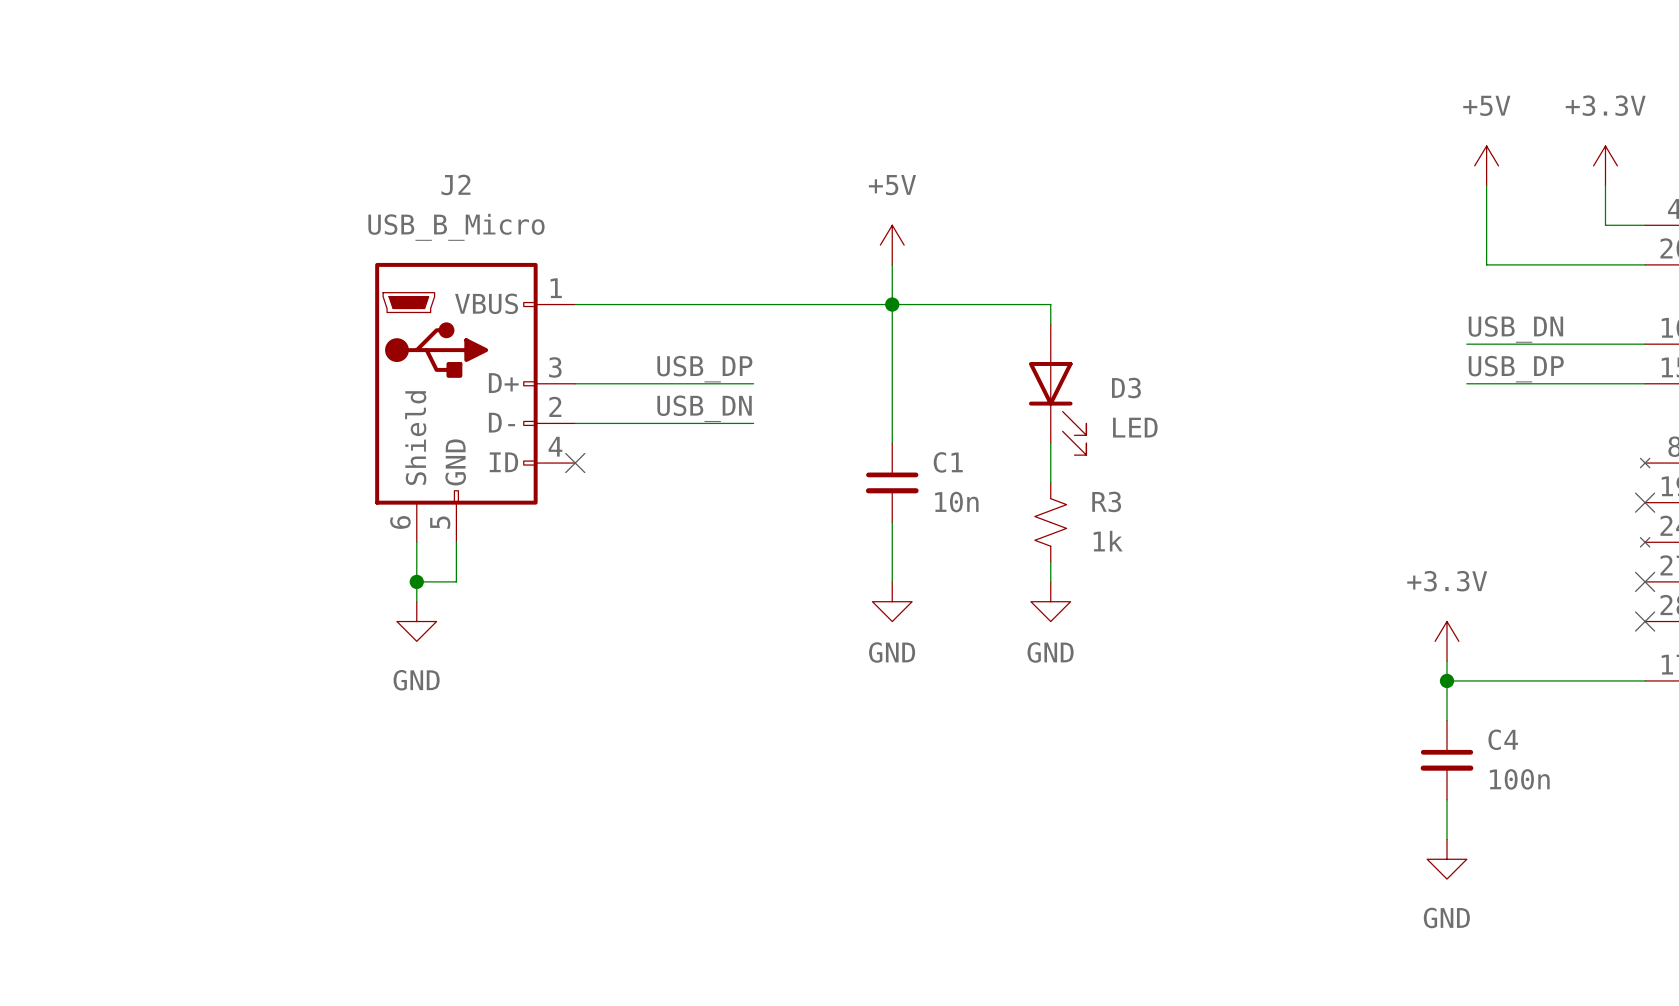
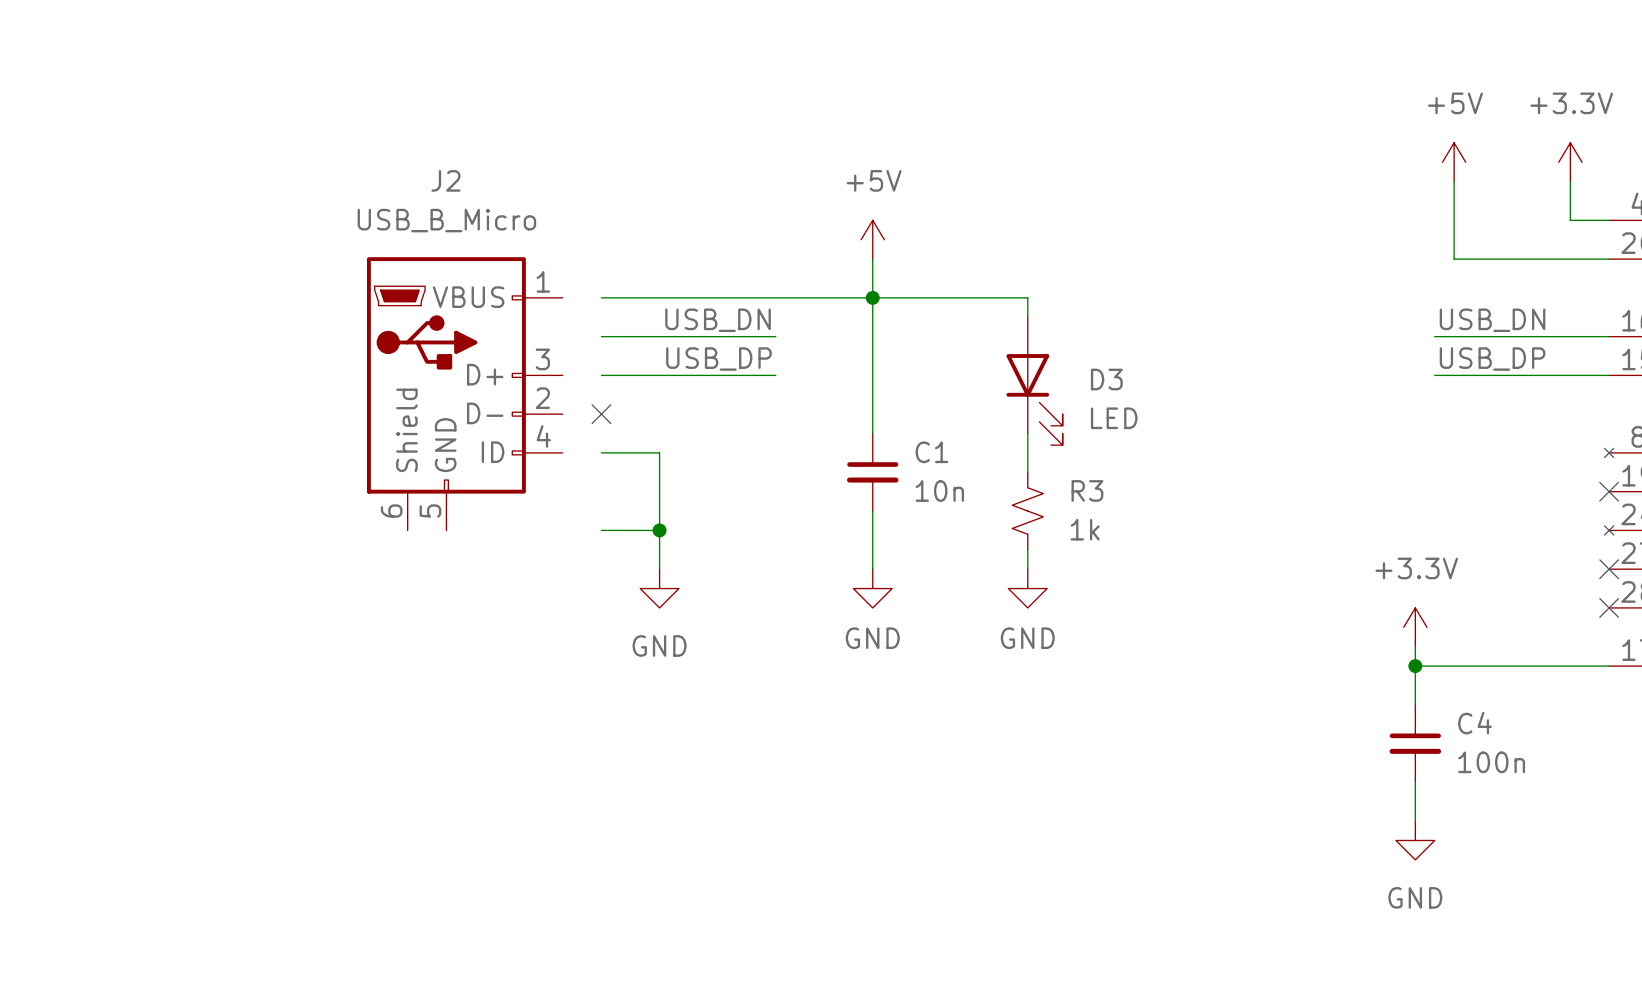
wire: (575, 304) (614, 304) -> none
label position: USB_DP (704, 369) -> USB_DP (718, 359)
wire: (575, 383) (614, 383) -> (737, 375) (775, 375)
label position: USB_DN (704, 408) -> USB_DN (718, 320)
wire: (575, 423) (753, 423) -> (601, 336) (775, 336)
no-connect mark position: (575, 463) -> (601, 414)
wire: none -> (601, 452) (659, 452) (659, 569)
wire: (416, 542) (416, 601) -> none
wire: (456, 542) (456, 581) (416, 581) -> none
wire: none -> (601, 530) (659, 530)
junction: none -> (659, 530)
junction: (416, 581) -> none
power symbol position: GND (416, 621) -> GND (659, 588)

